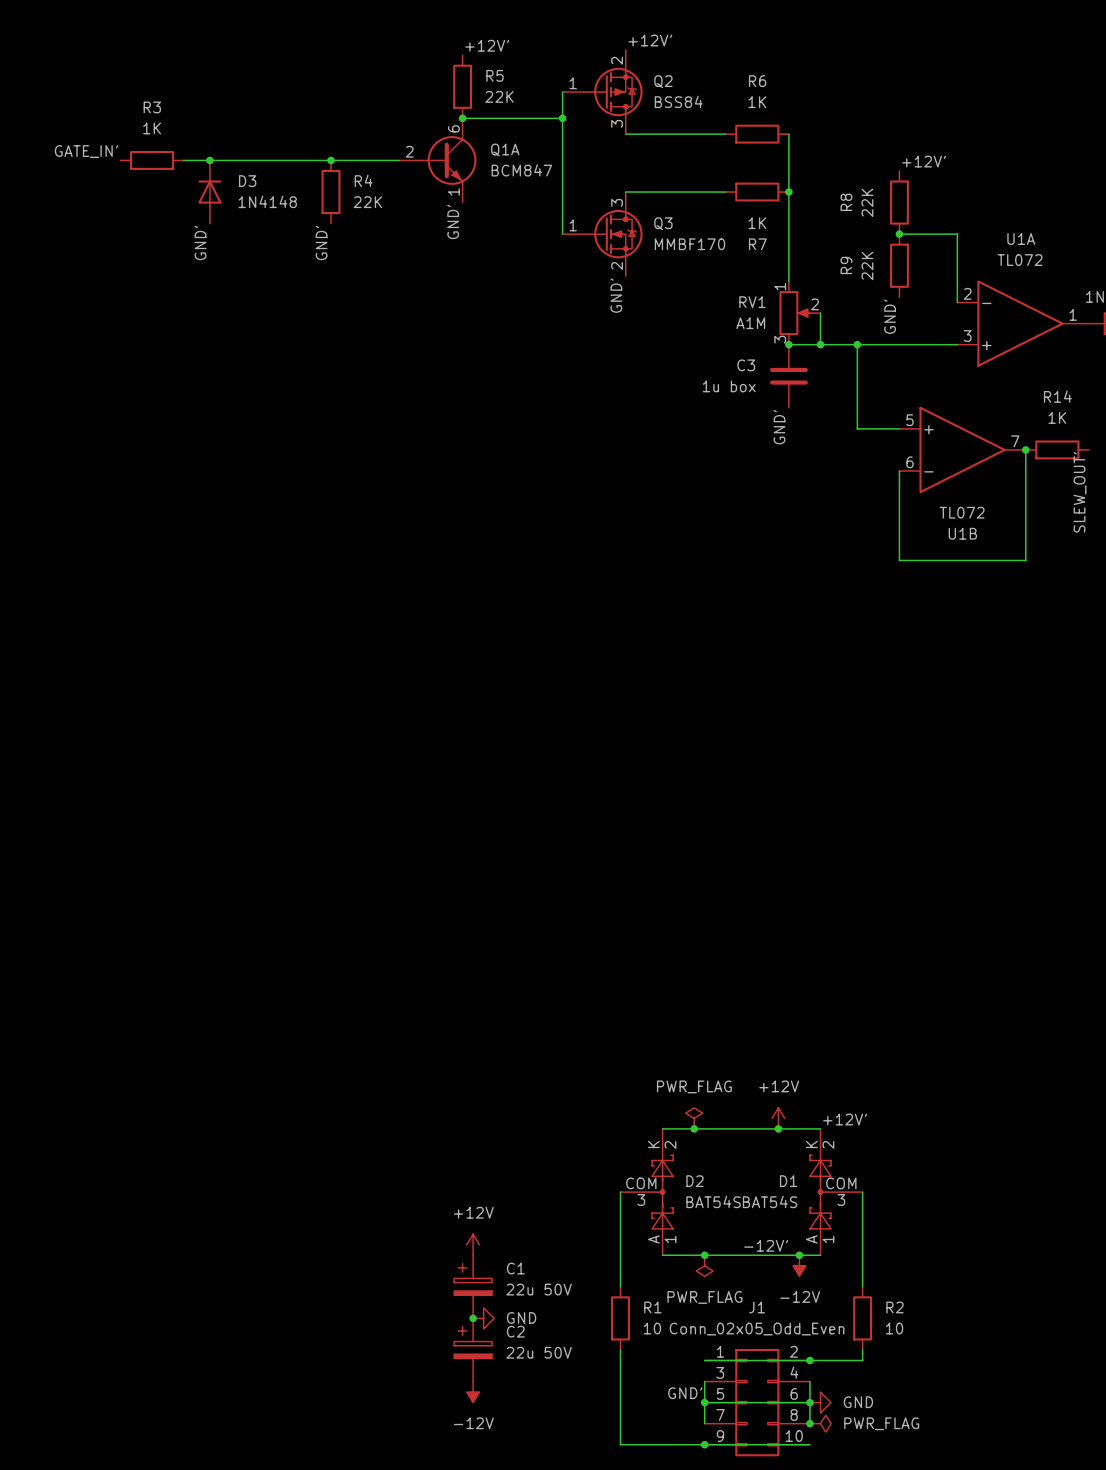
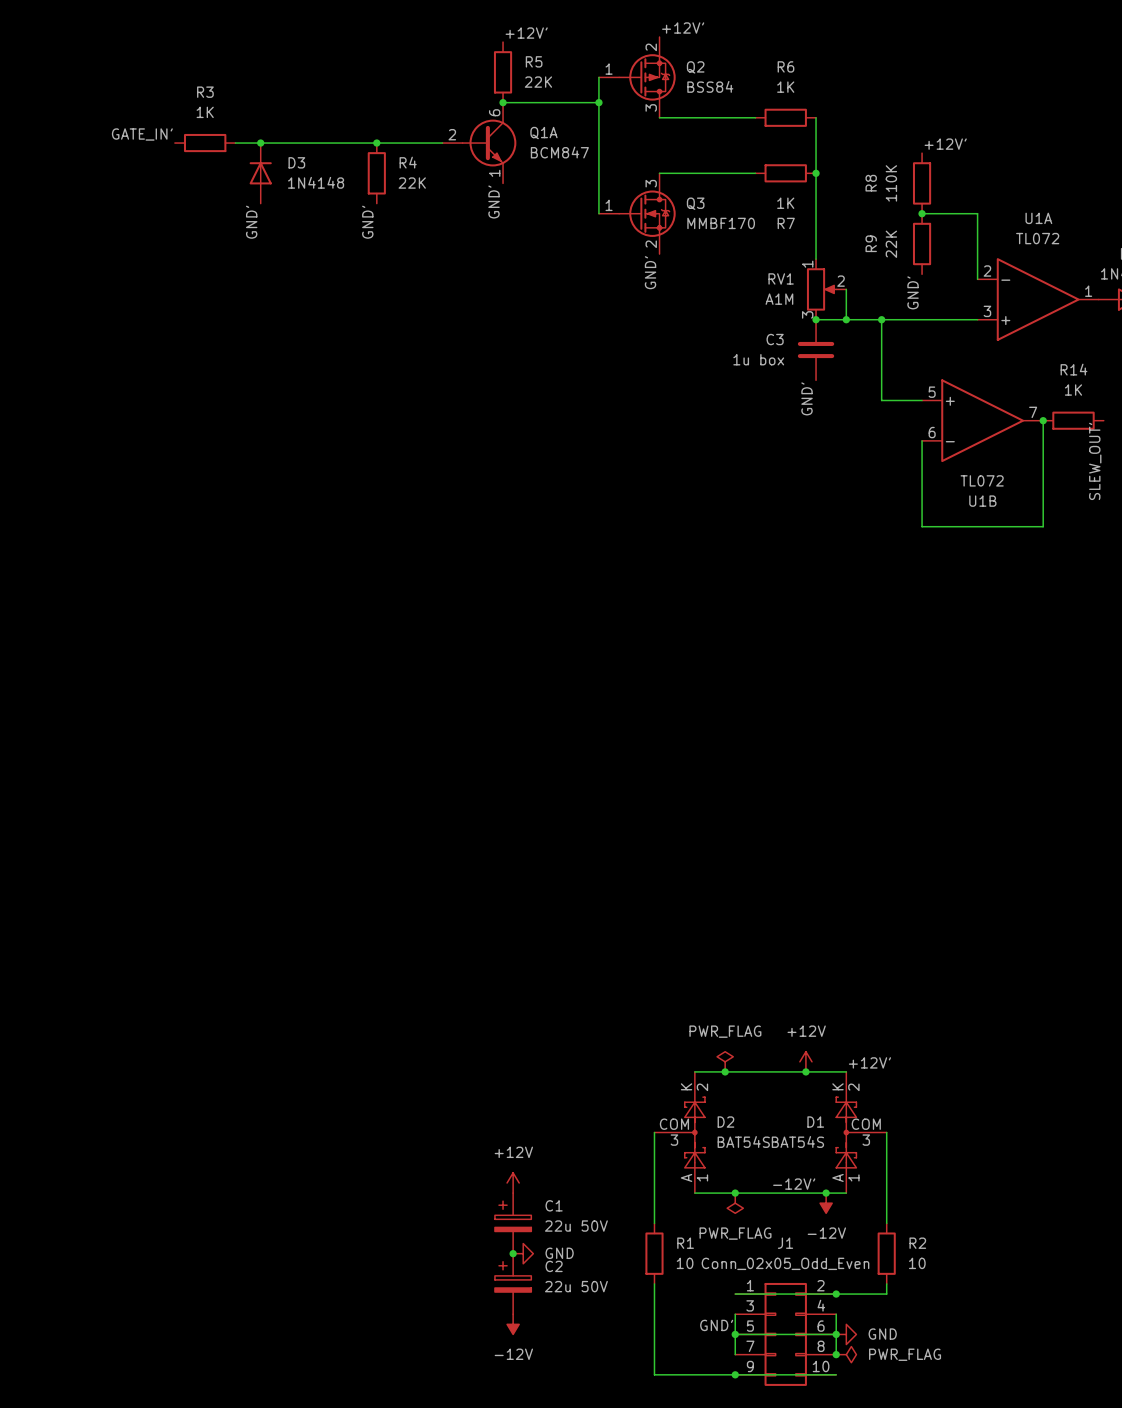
R8 value: 22K (867, 202) -> 110K (891, 183)

